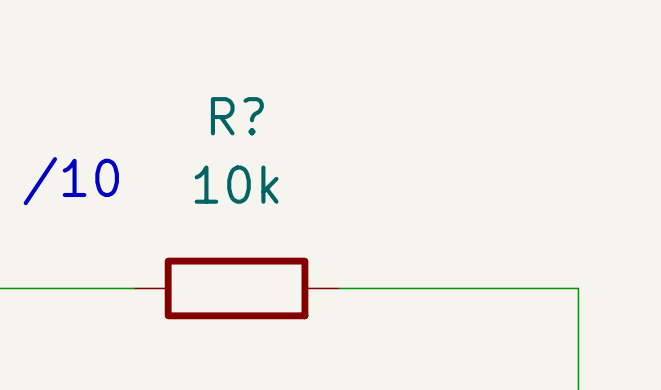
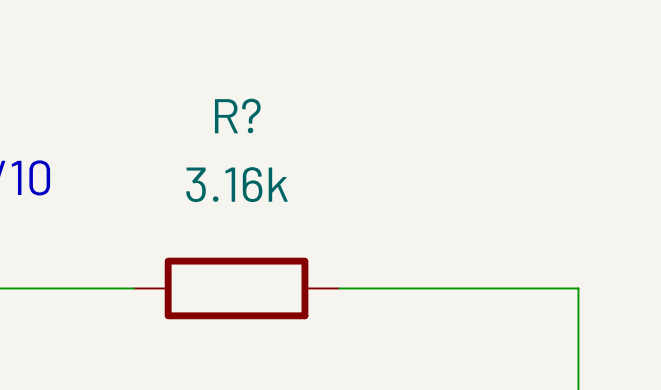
R? value: 10k (236, 184) -> 3.16k (237, 184)

